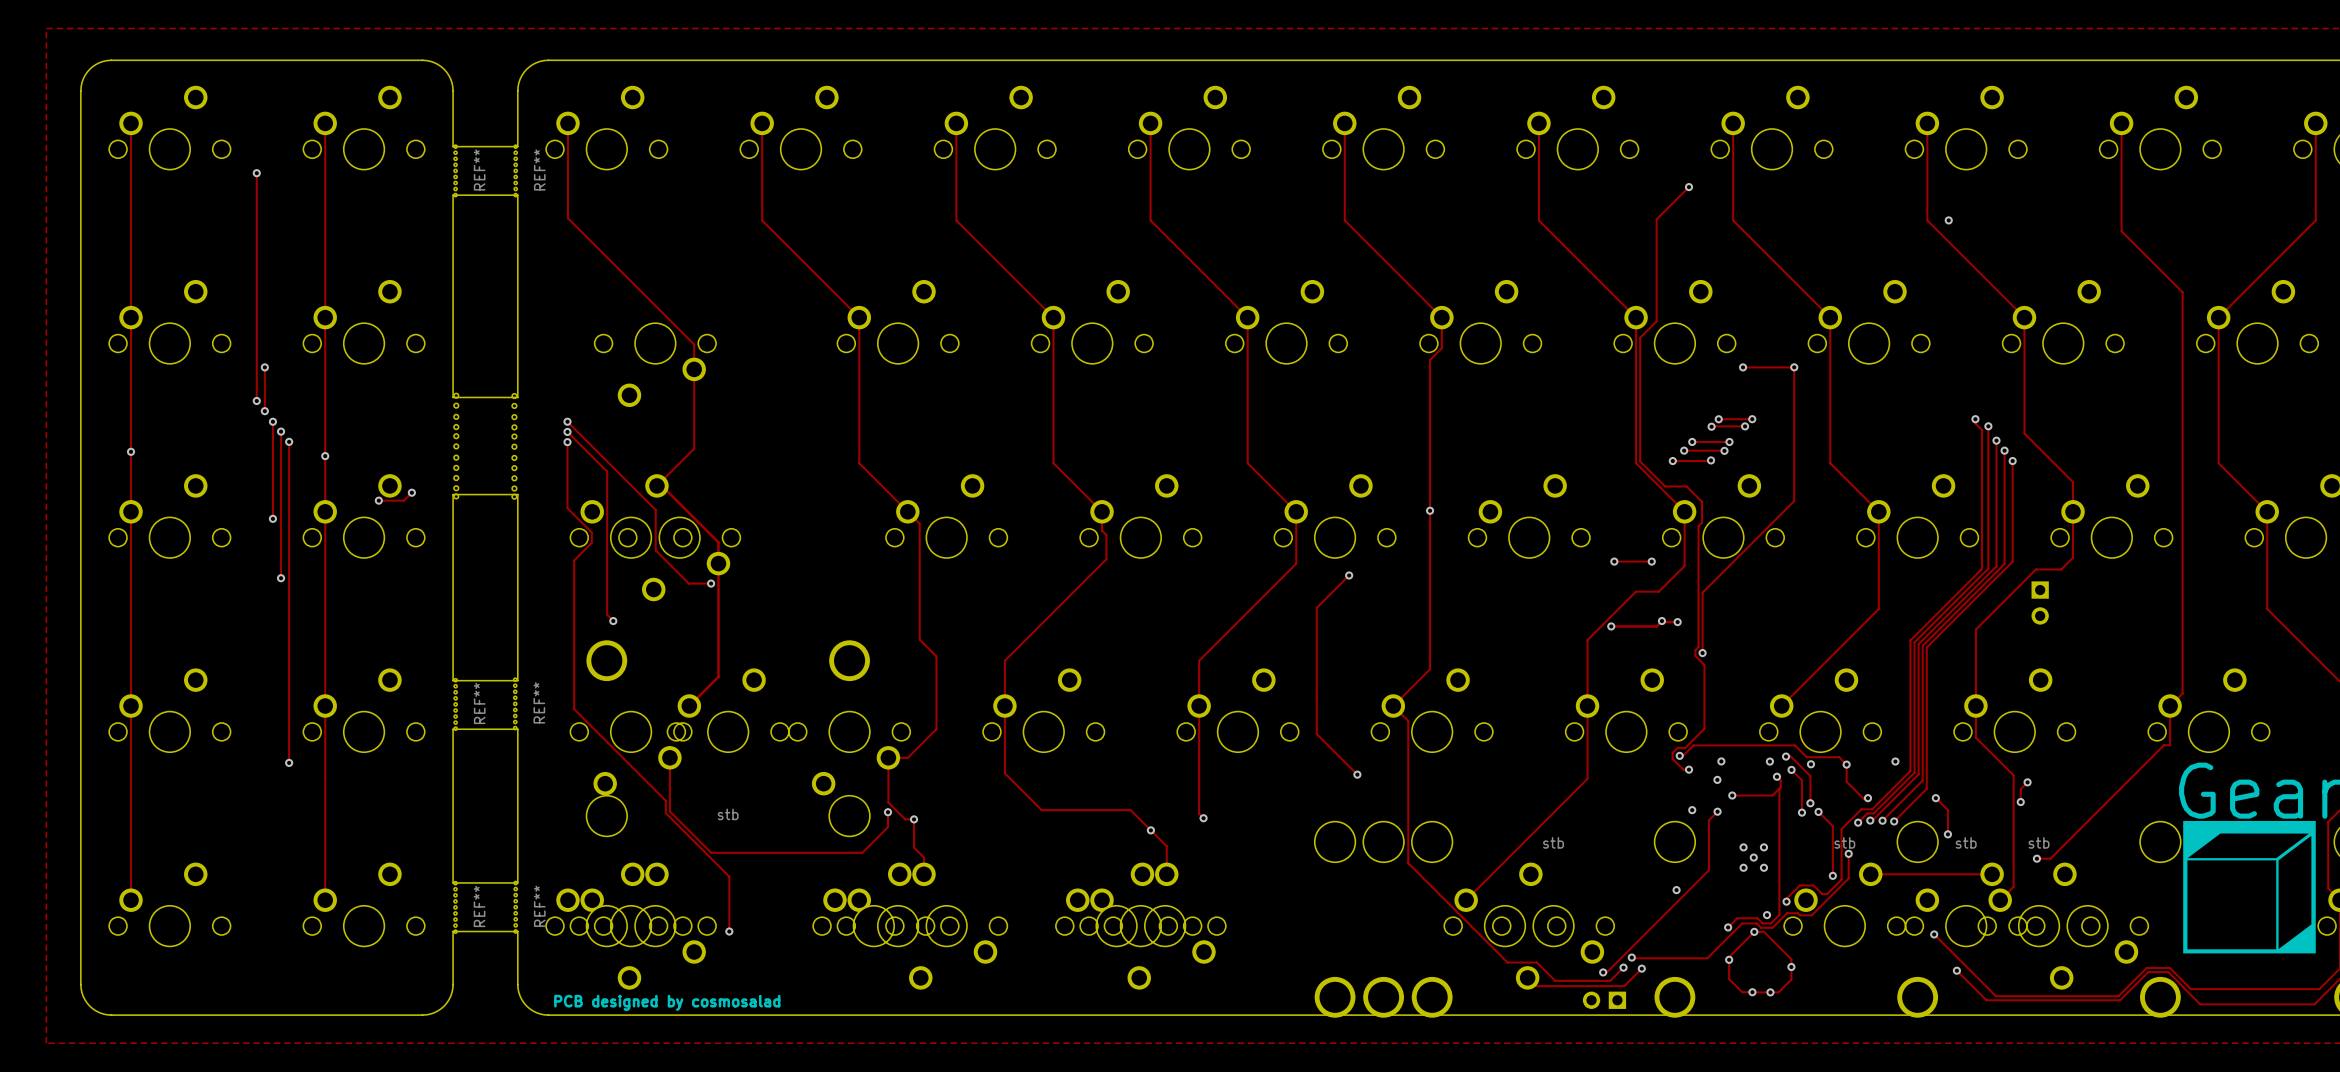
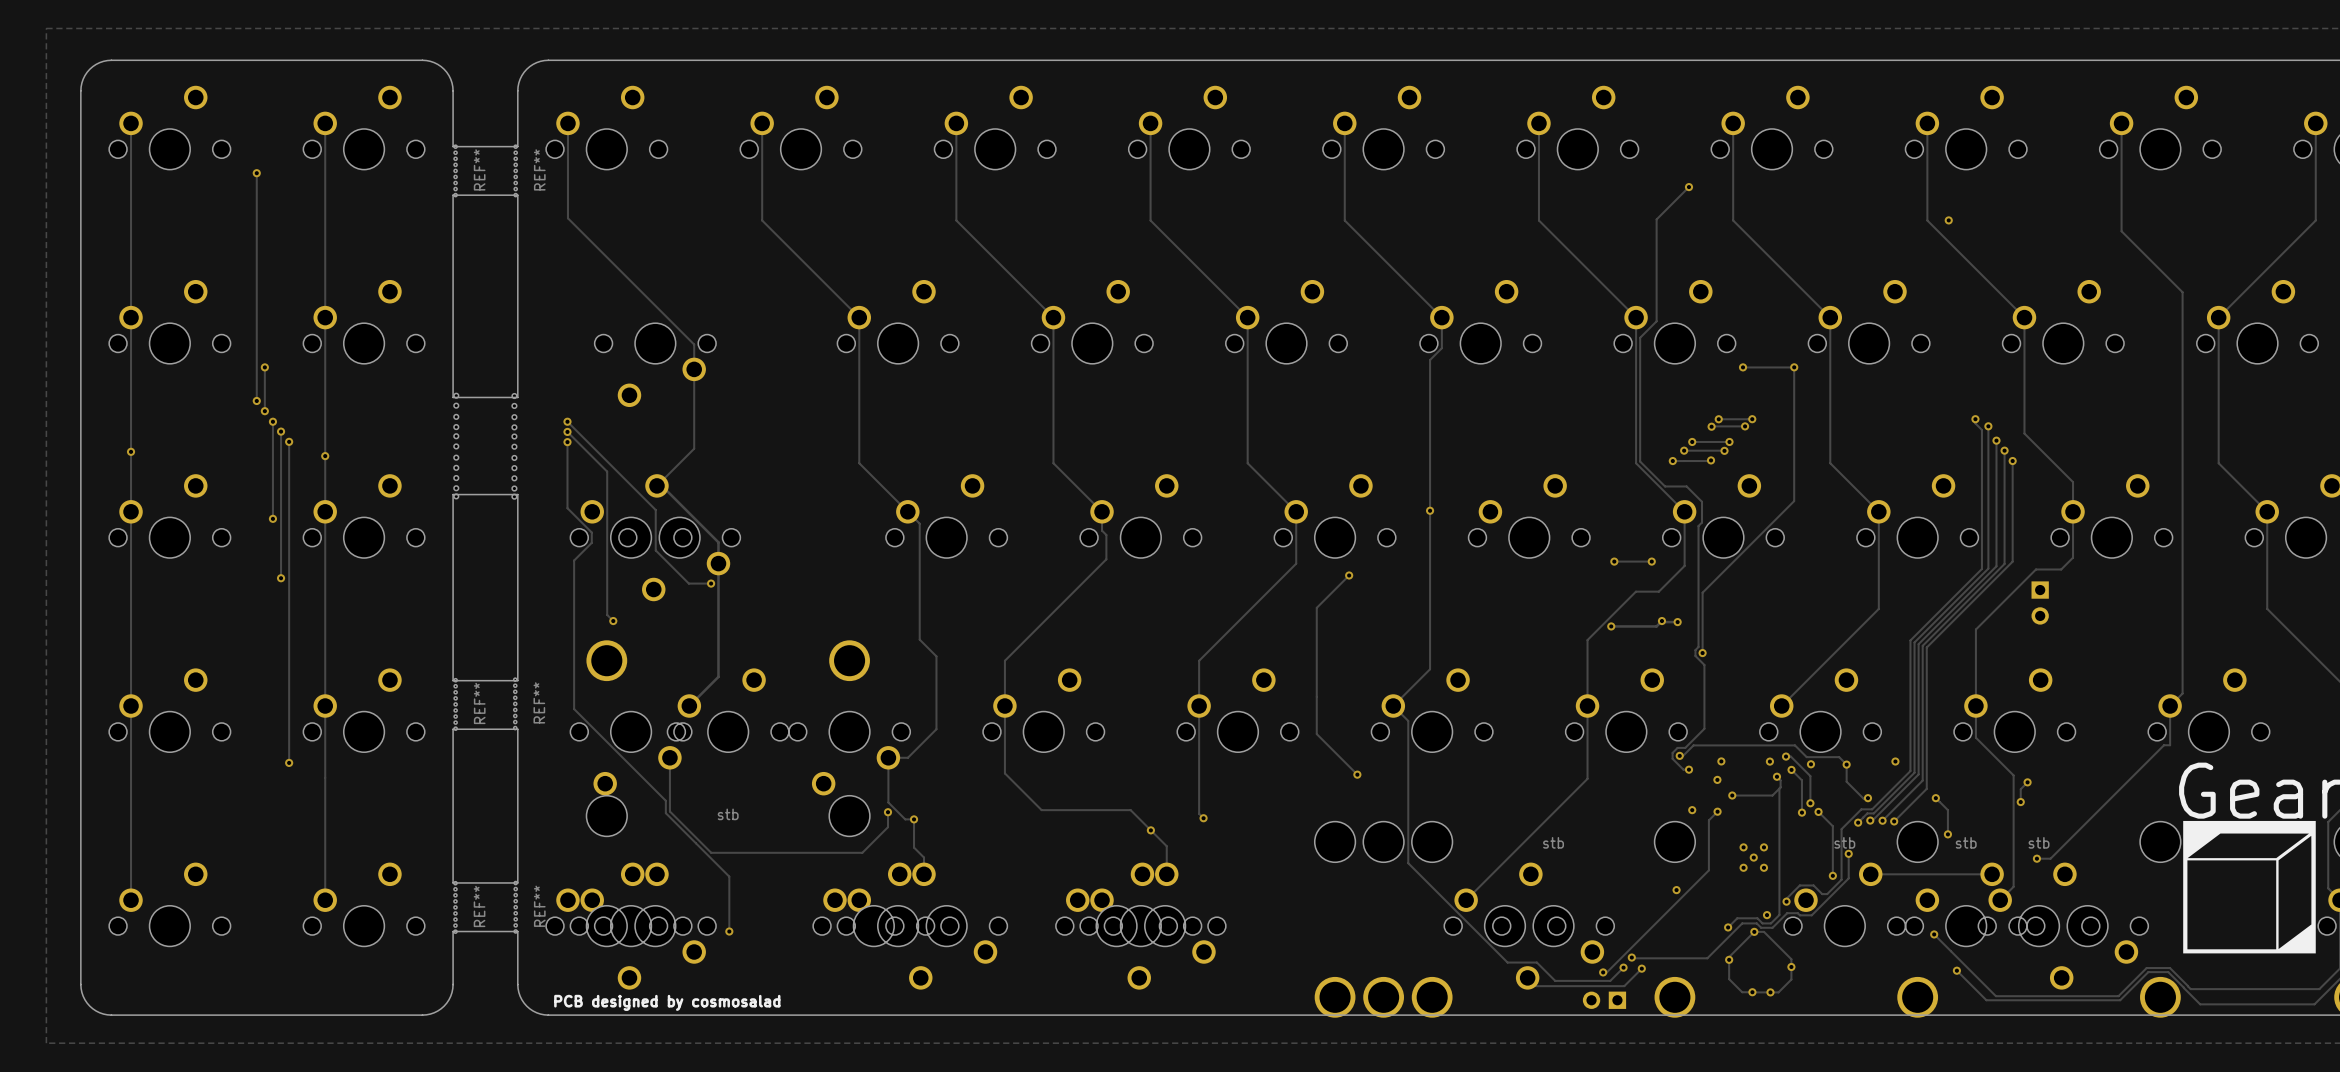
track: (411, 492) (403, 500) (378, 500) -> none
via: (411, 492) -> none
via: (378, 500) -> none

